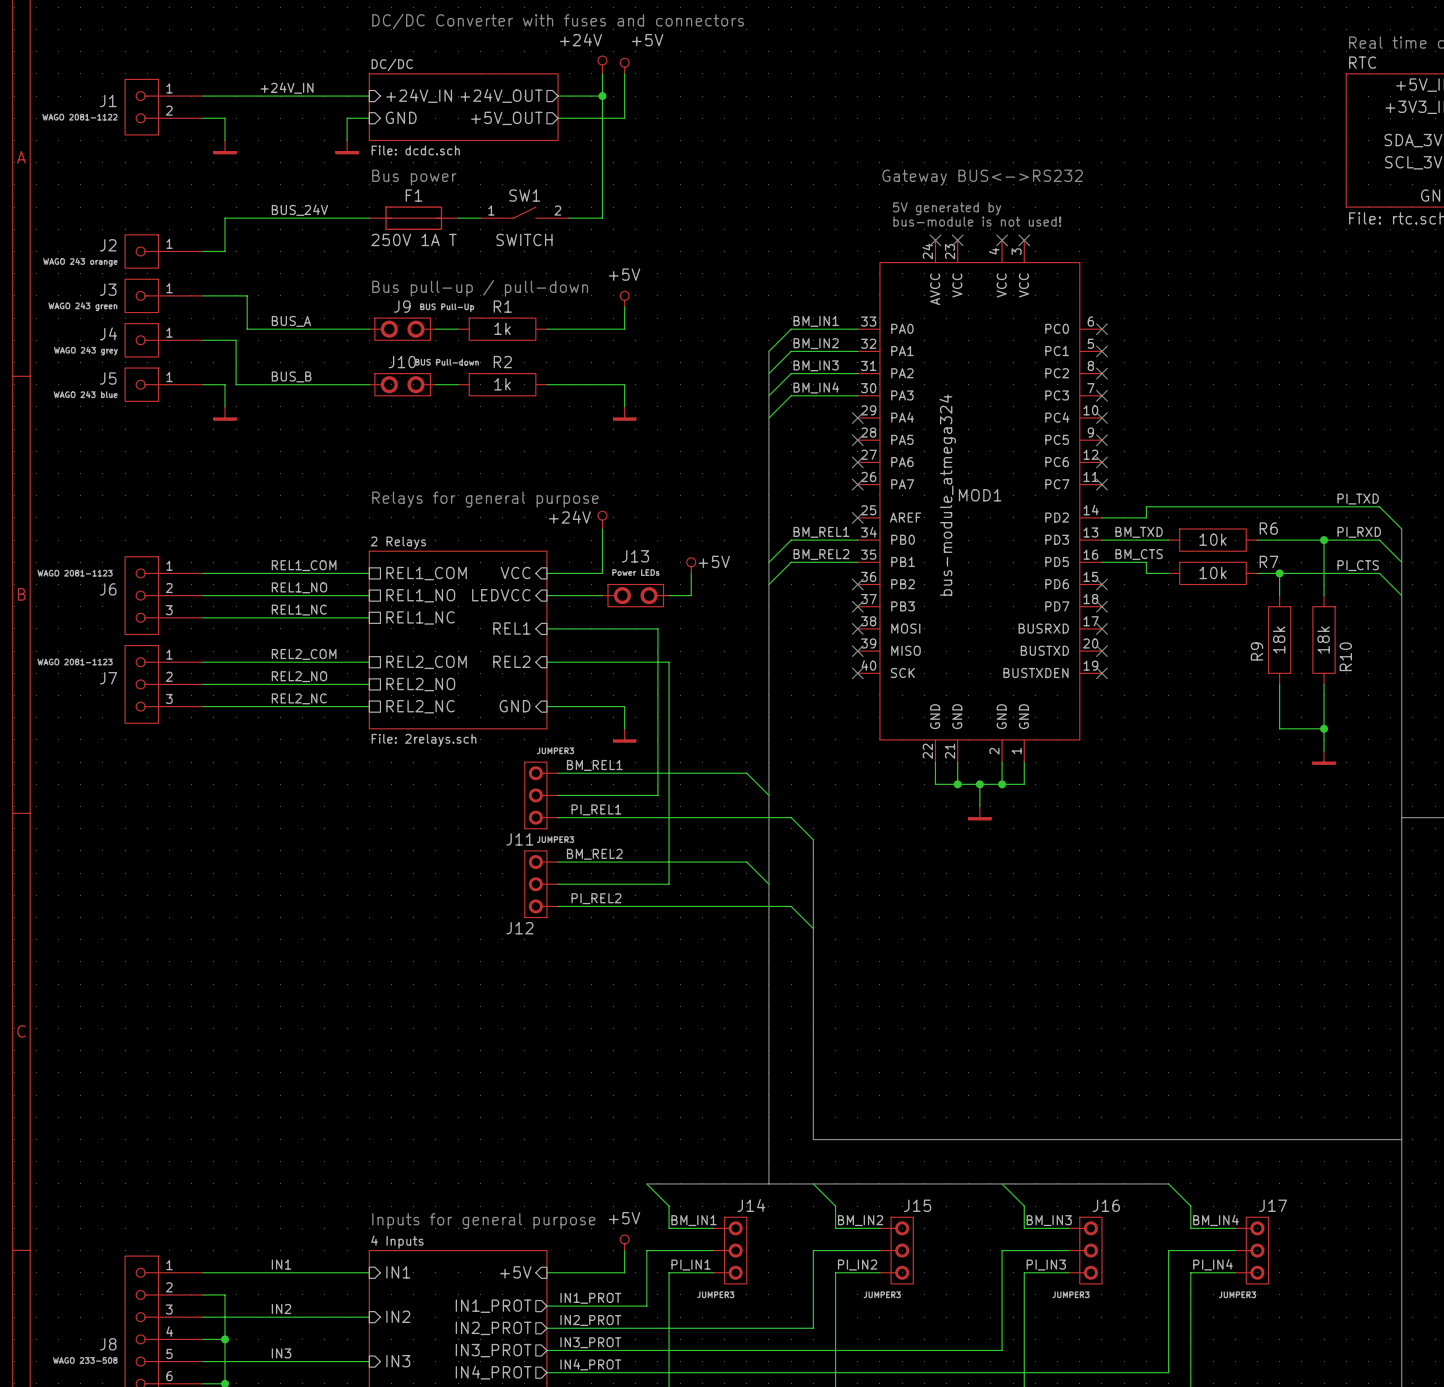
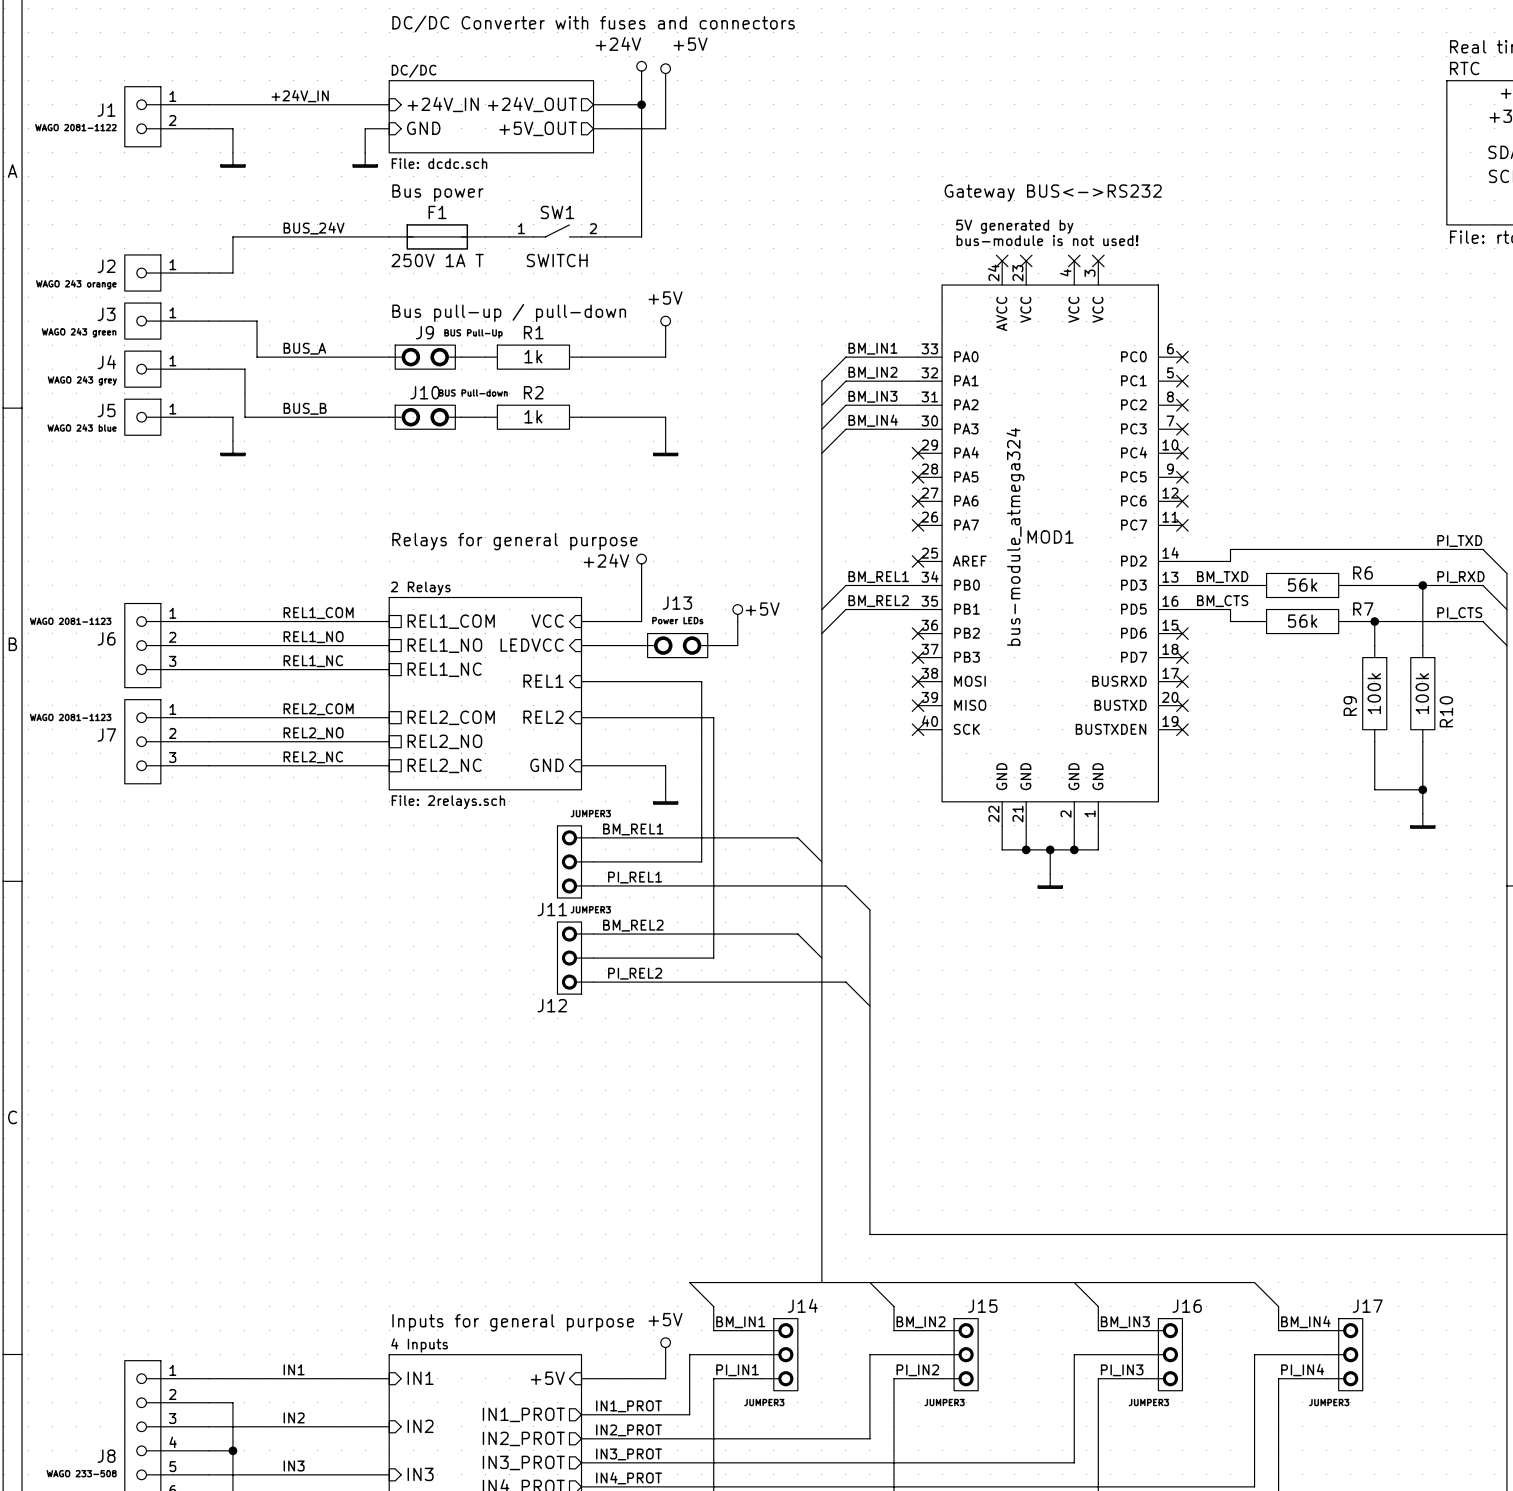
R6 value: 10k (1213, 539) -> 56k (1302, 585)
R7 value: 10k (1213, 572) -> 56k (1302, 621)
R9 value: 18k (1279, 640) -> 100k (1374, 693)
R10 value: 18k (1323, 640) -> 100k (1422, 693)

